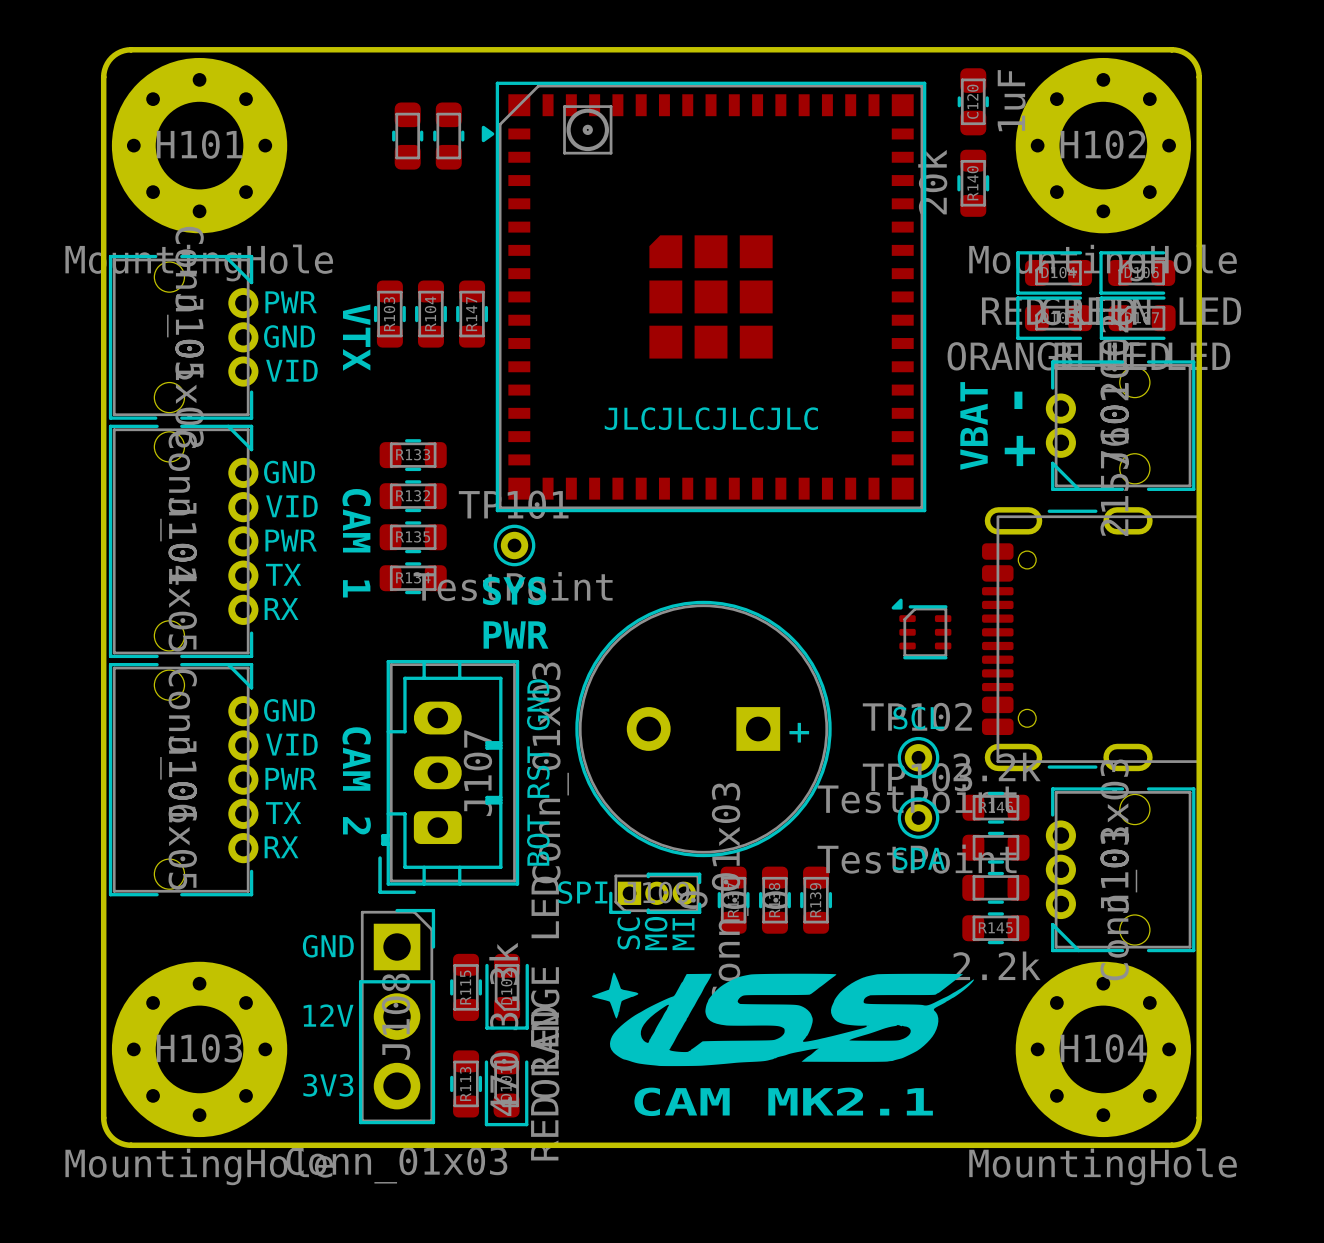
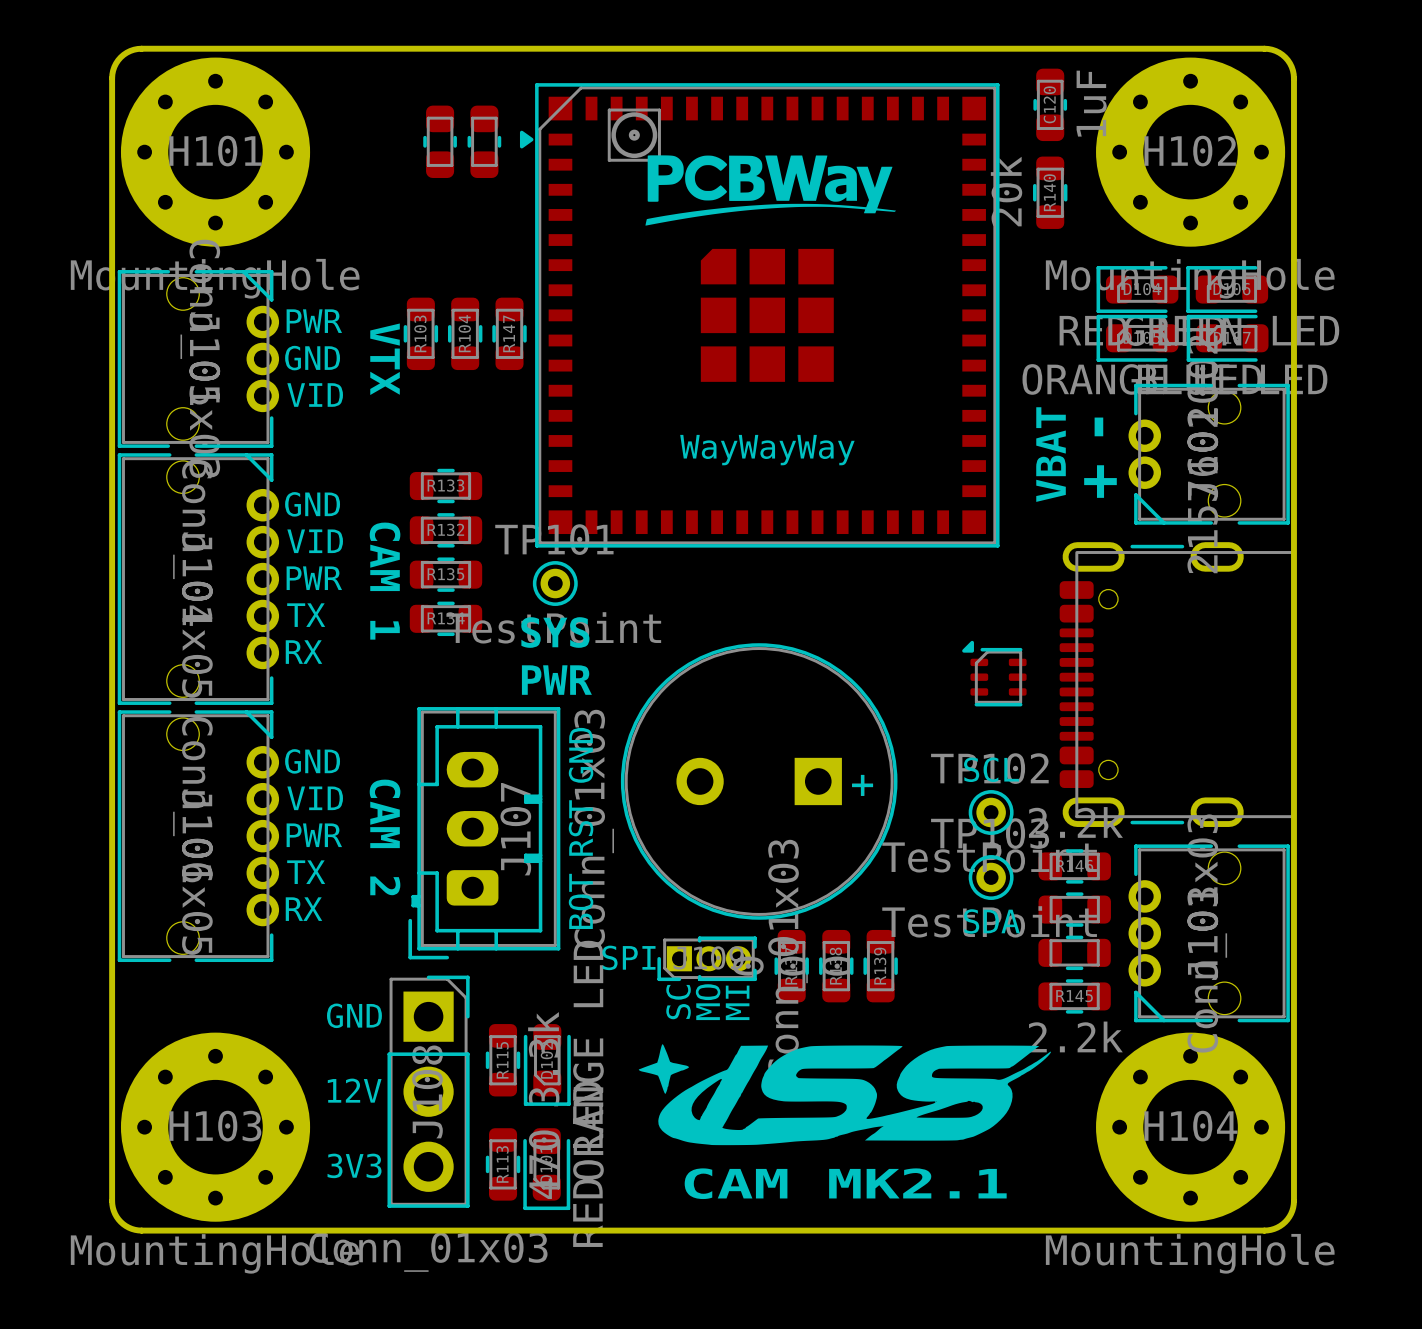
drawing: none -> [645, 155, 896, 226]
text: JLCJLCJLCJLC (711, 418) -> WayWayWay (767, 450)

